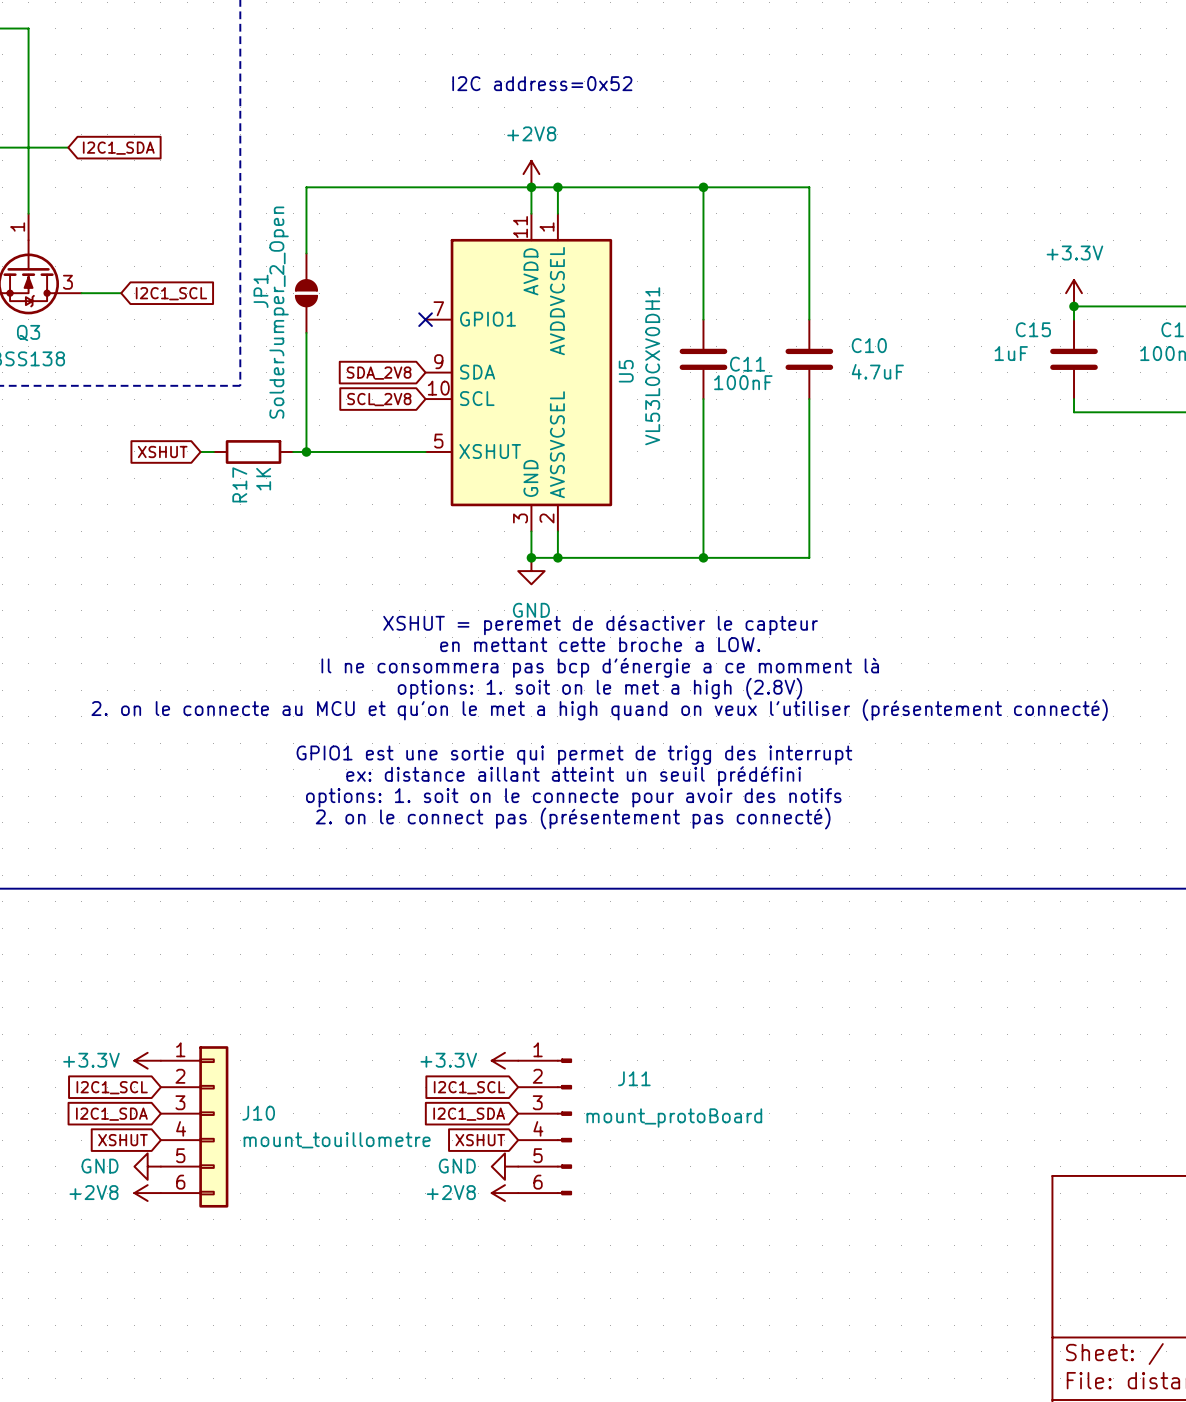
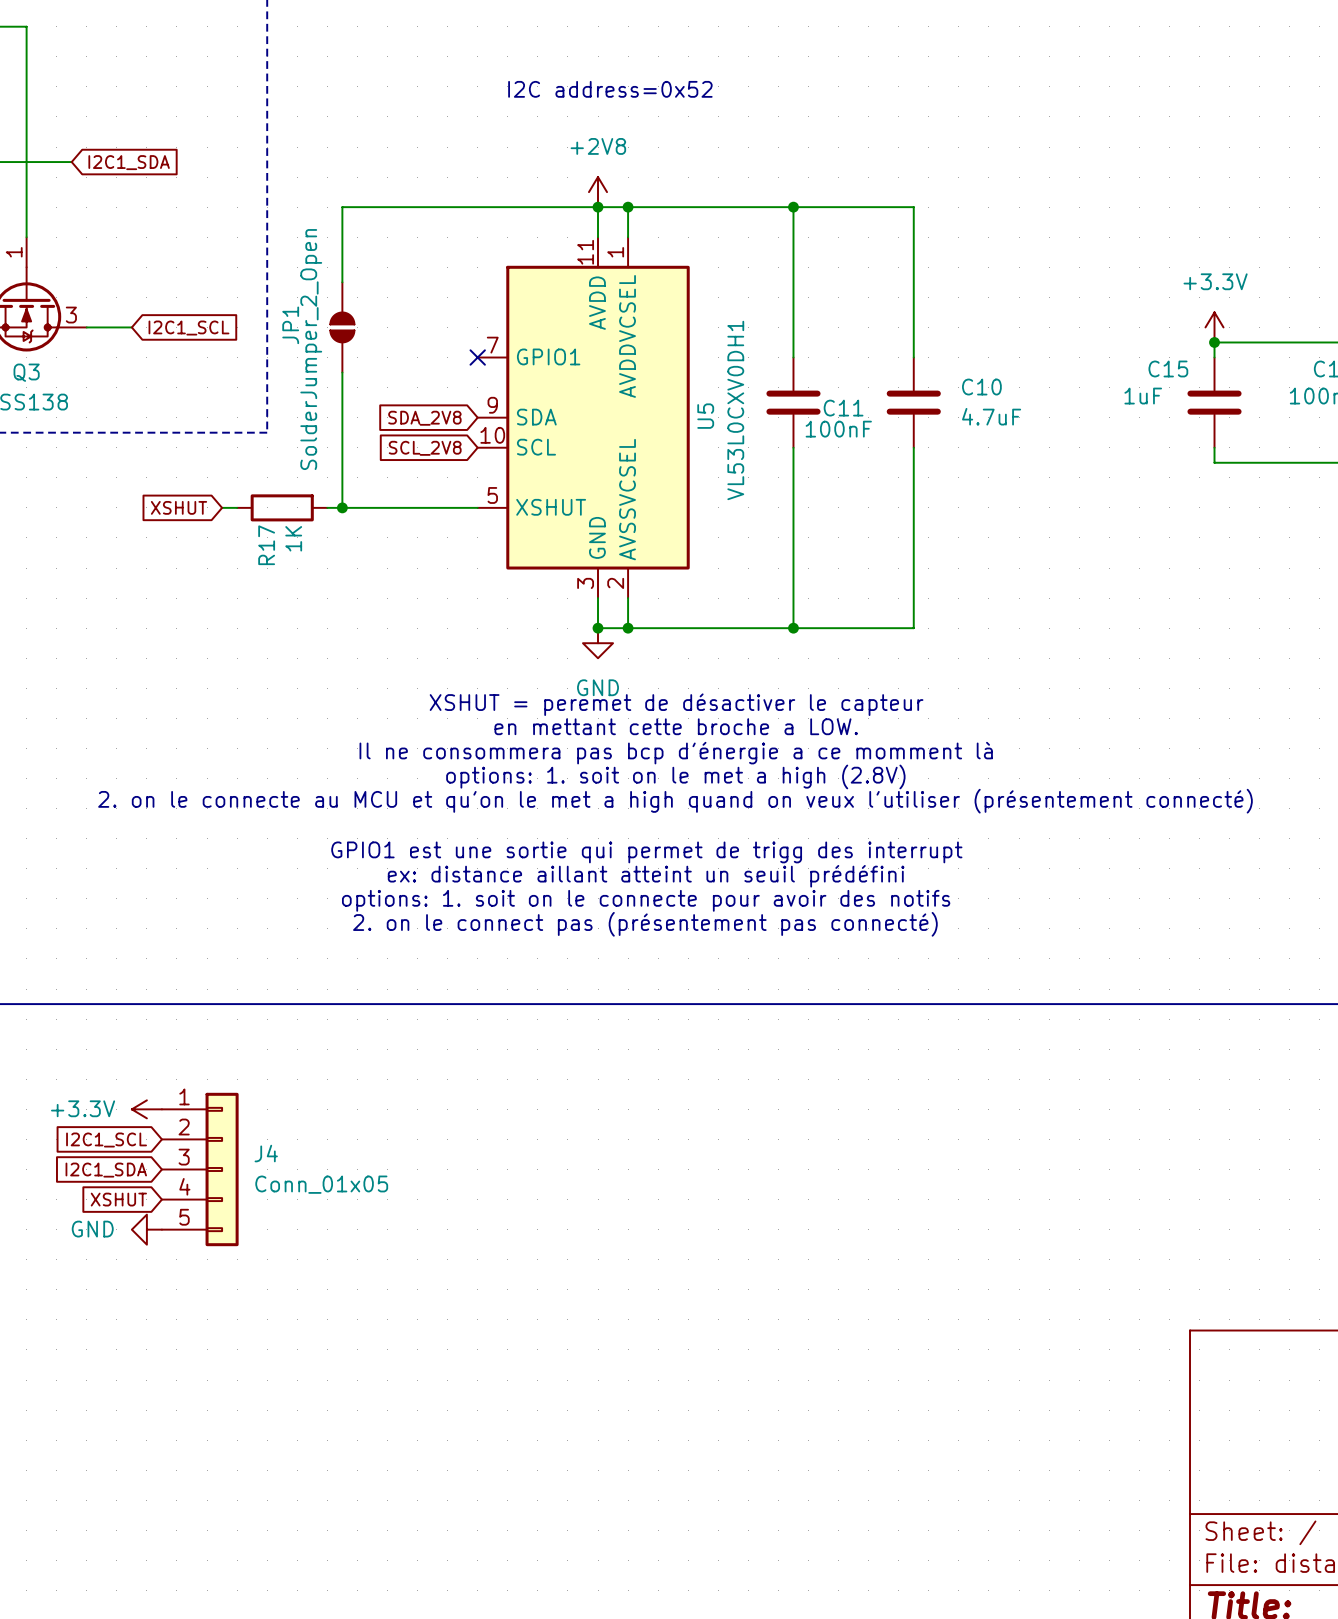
J4: none -> Conn_01x05 (200, 1169)
power symbol position: +3.3V (147, 1060) -> +3.3V (146, 1109)
power symbol: +3.3V (504, 1060) -> none
global label position: I2C1_SCL (112, 1087) -> I2C1_SCL (106, 1139)
global label: I2C1_SCL (469, 1087) -> none
global label position: I2C1_SDA (111, 1114) -> I2C1_SDA (106, 1170)
global label: I2C1_SDA (469, 1114) -> none
J10: mount_touillometre (194, 1126) -> none
J11: mount_protoBoard (545, 1126) -> none
global label position: XSHUT (122, 1140) -> XSHUT (118, 1199)
global label: XSHUT (480, 1140) -> none
power symbol position: GND (147, 1166) -> GND (146, 1229)
power symbol: GND (504, 1166) -> none
power symbol: +2V8 (147, 1193) -> none
power symbol: +2V8 (504, 1193) -> none

